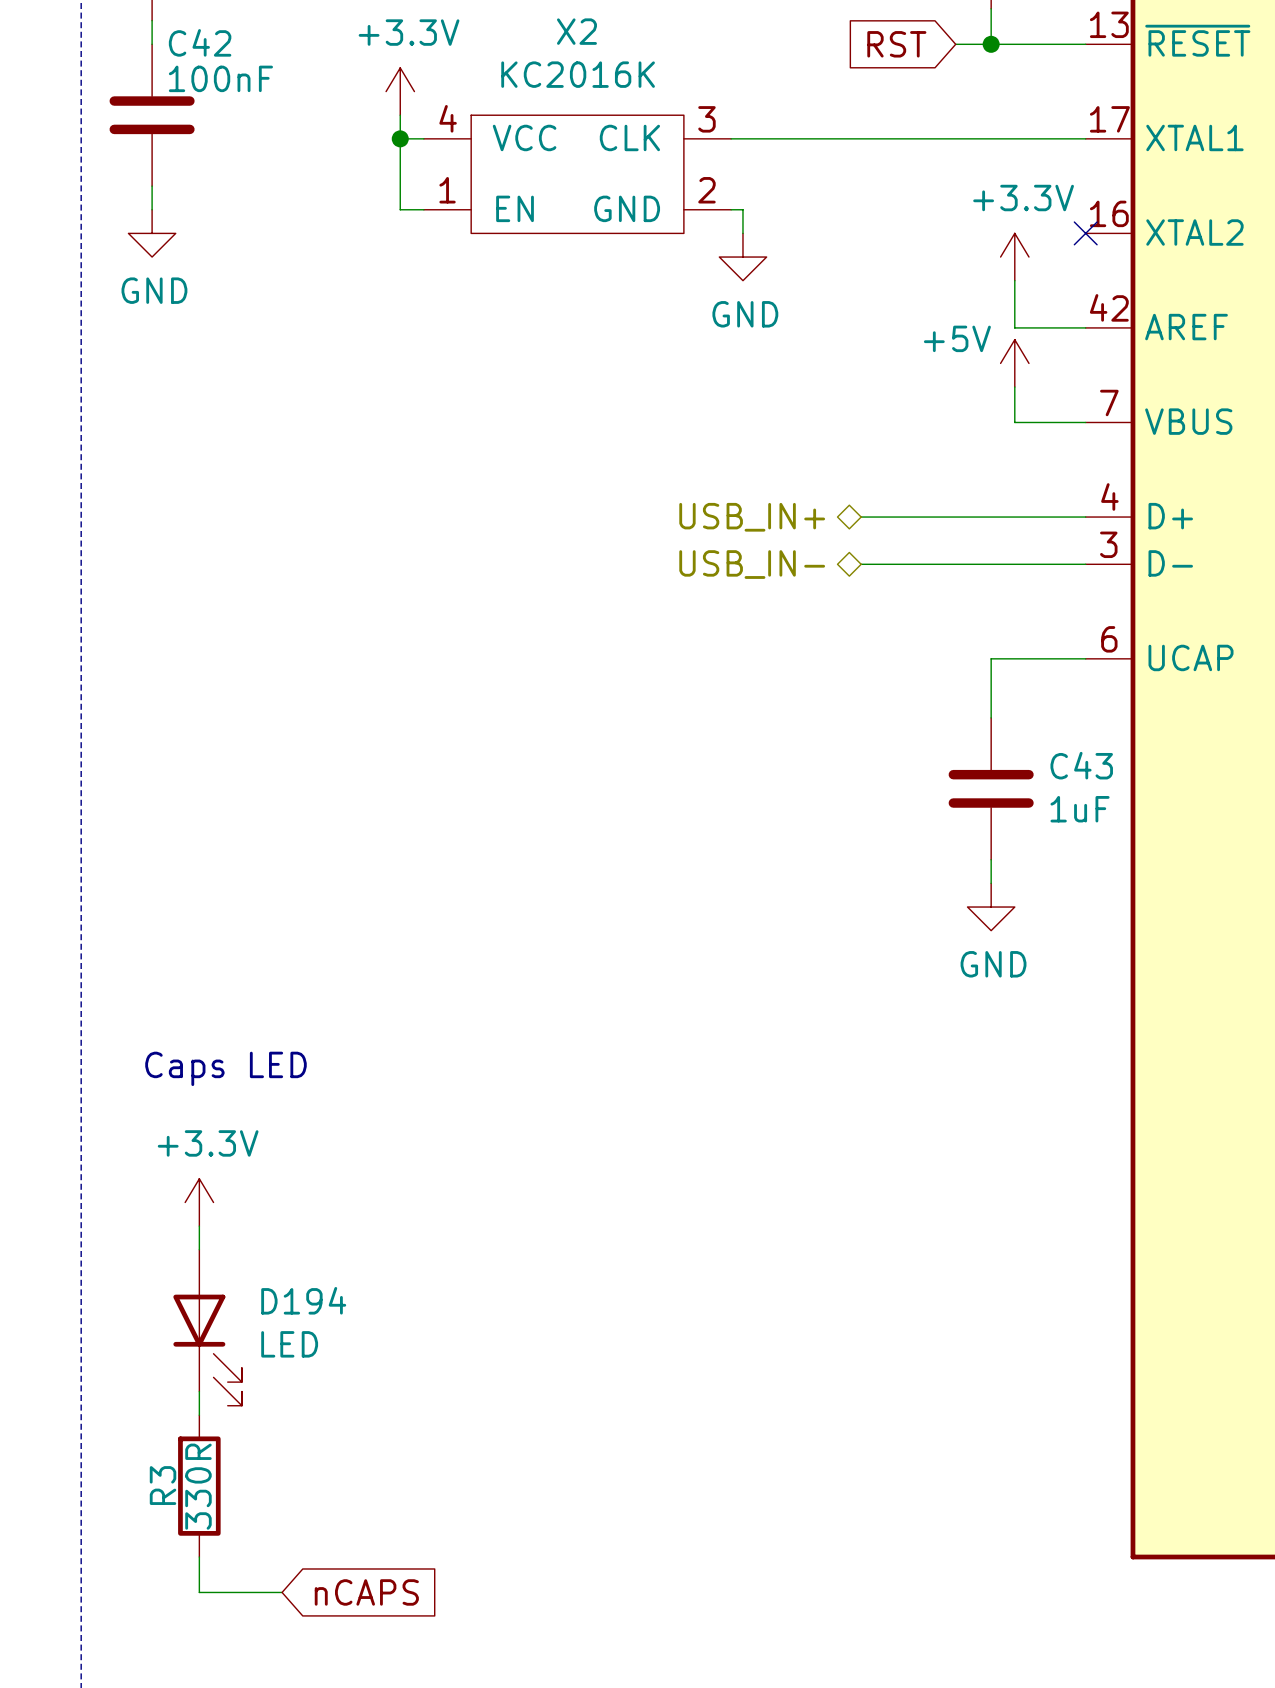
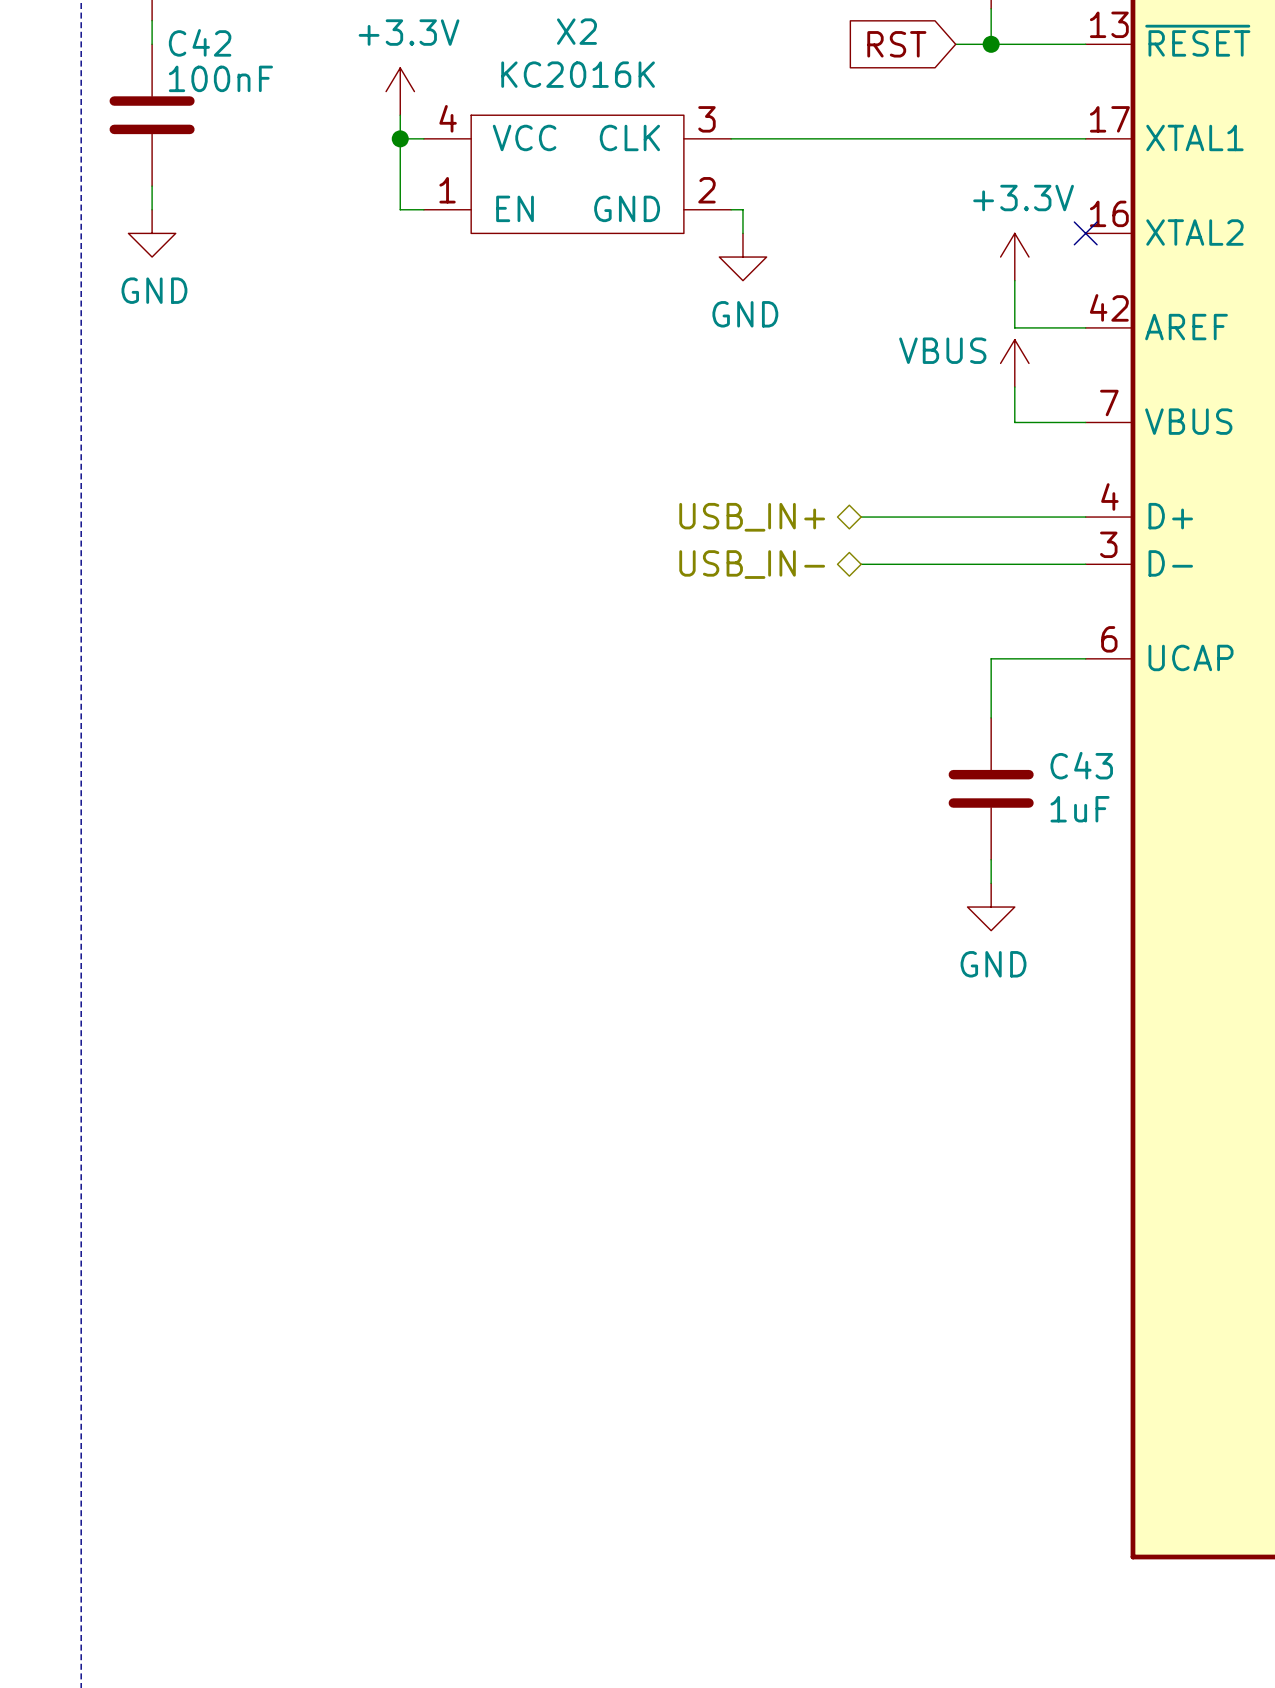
power symbol: +5V (1014, 363) -> VBUS (1014, 363)
text: Caps LED (225, 1068) -> none
power symbol: +3.3V (199, 1202) -> none
wire: (199, 1226) (199, 1249) -> none
D194: LED (207, 1327) -> none
wire: (199, 1391) (199, 1415) -> none
R3: 330R (199, 1486) -> none
wire: (199, 1557) (199, 1592) (282, 1592) -> none
global label: nCAPS (366, 1592) -> none

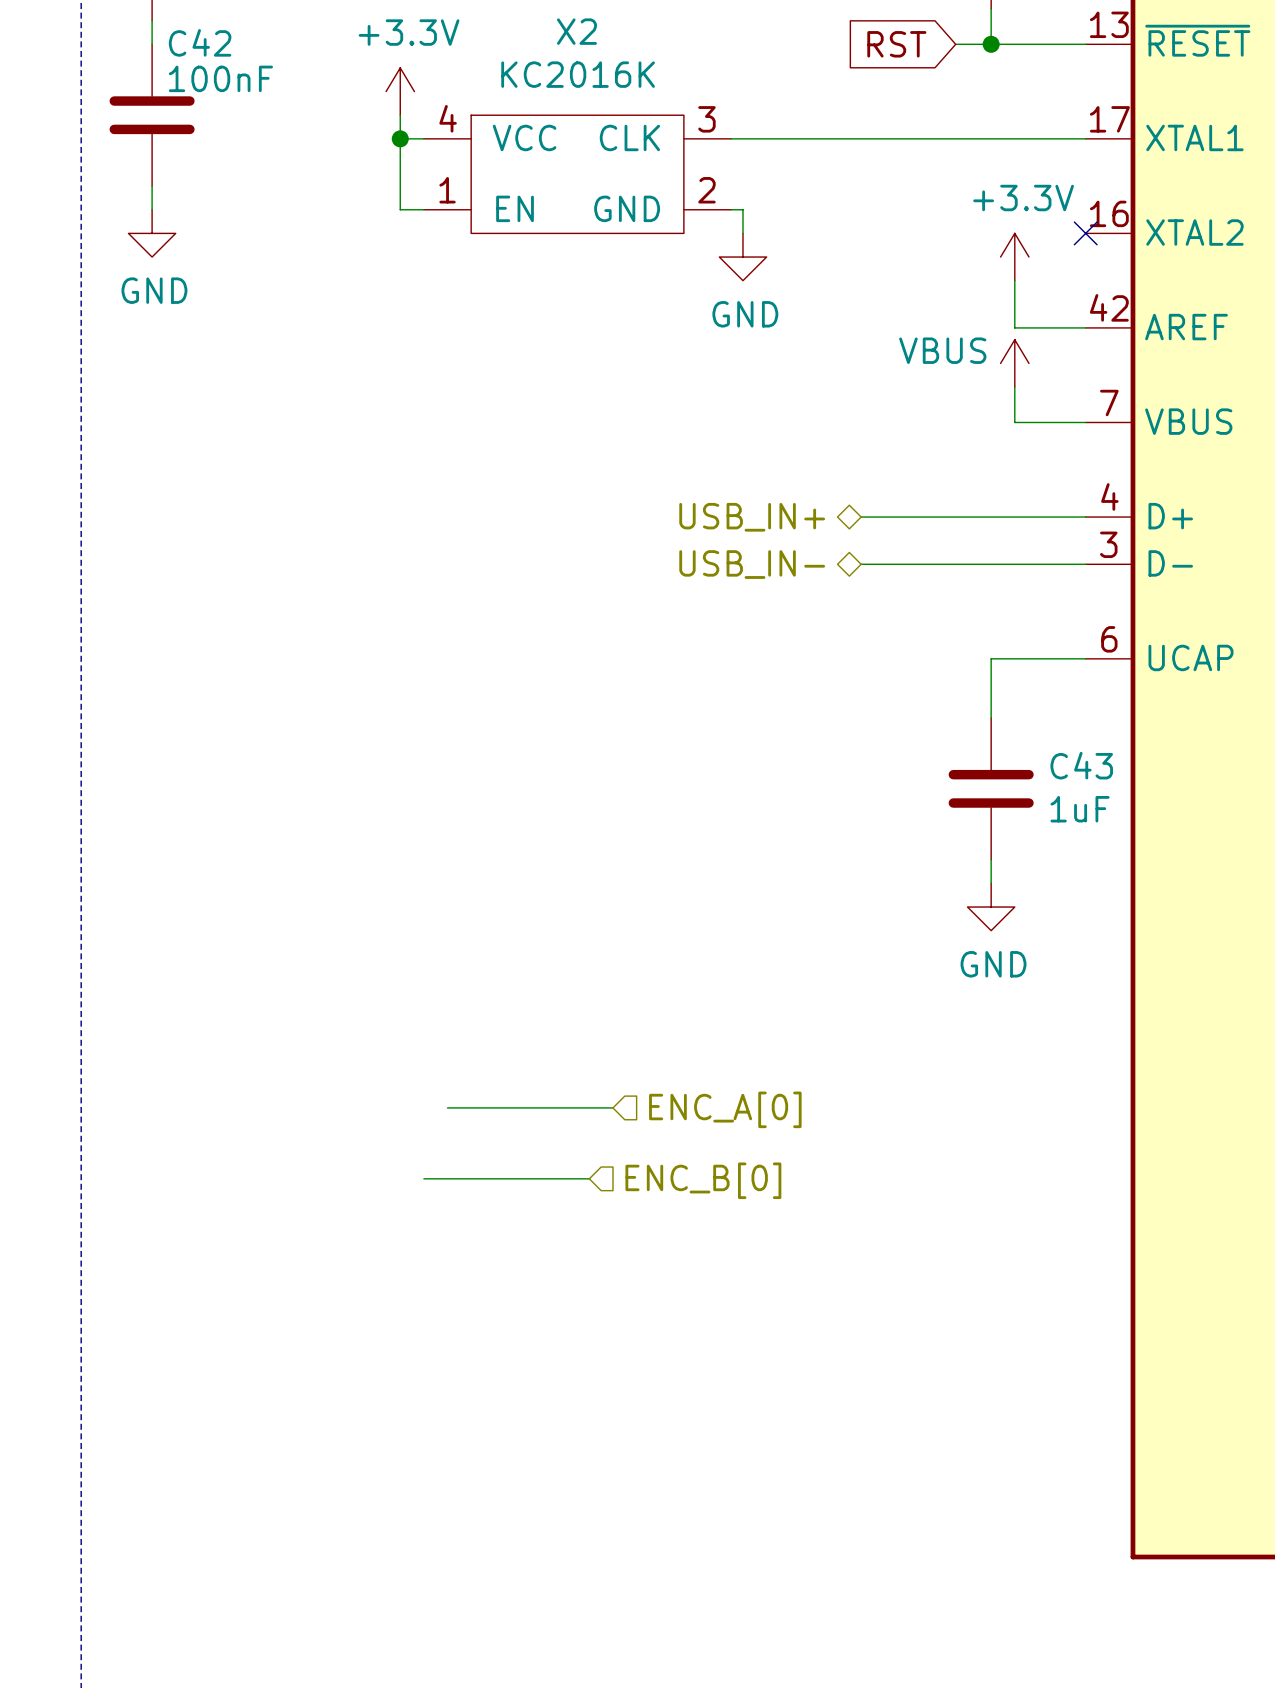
wire: none -> (447, 1107) (612, 1107)
hierarchical label: none -> ENC_A[0] (725, 1109)
wire: none -> (423, 1178) (589, 1178)
hierarchical label: none -> ENC_B[0] (703, 1180)

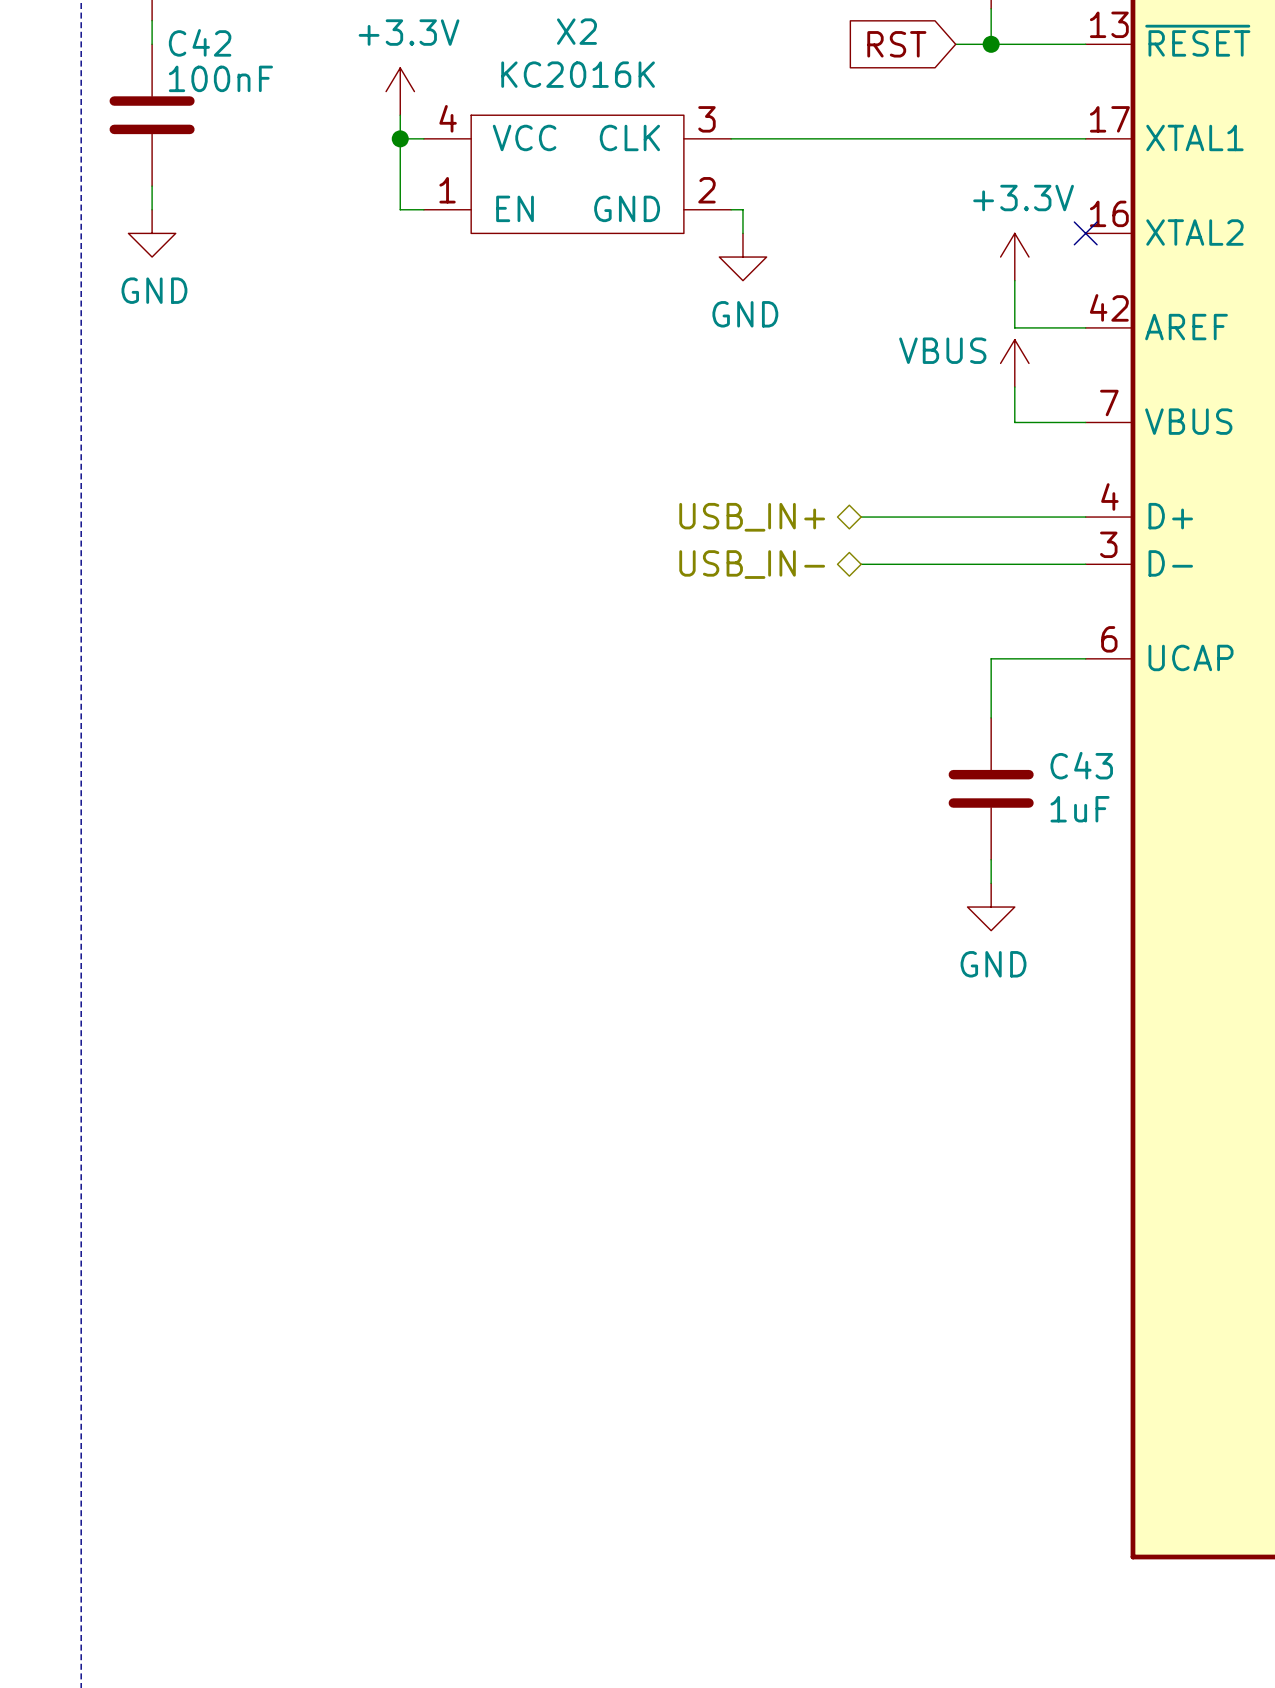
wire: (447, 1107) (612, 1107) -> none
hierarchical label: ENC_A[0] (725, 1109) -> none
wire: (423, 1178) (589, 1178) -> none
hierarchical label: ENC_B[0] (703, 1180) -> none

